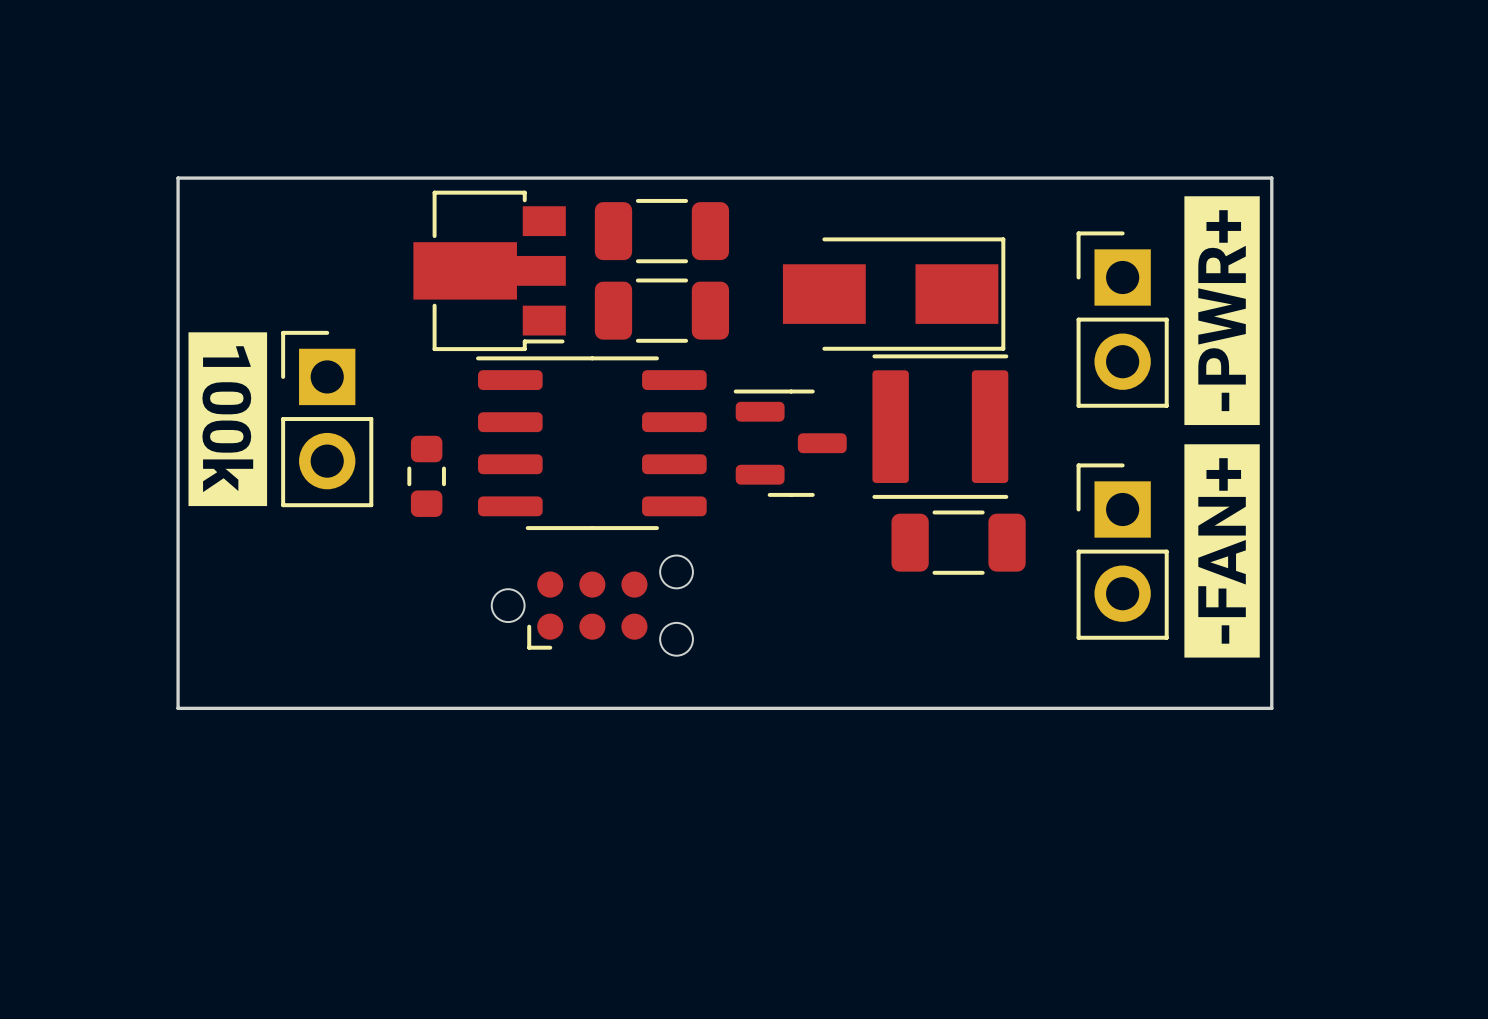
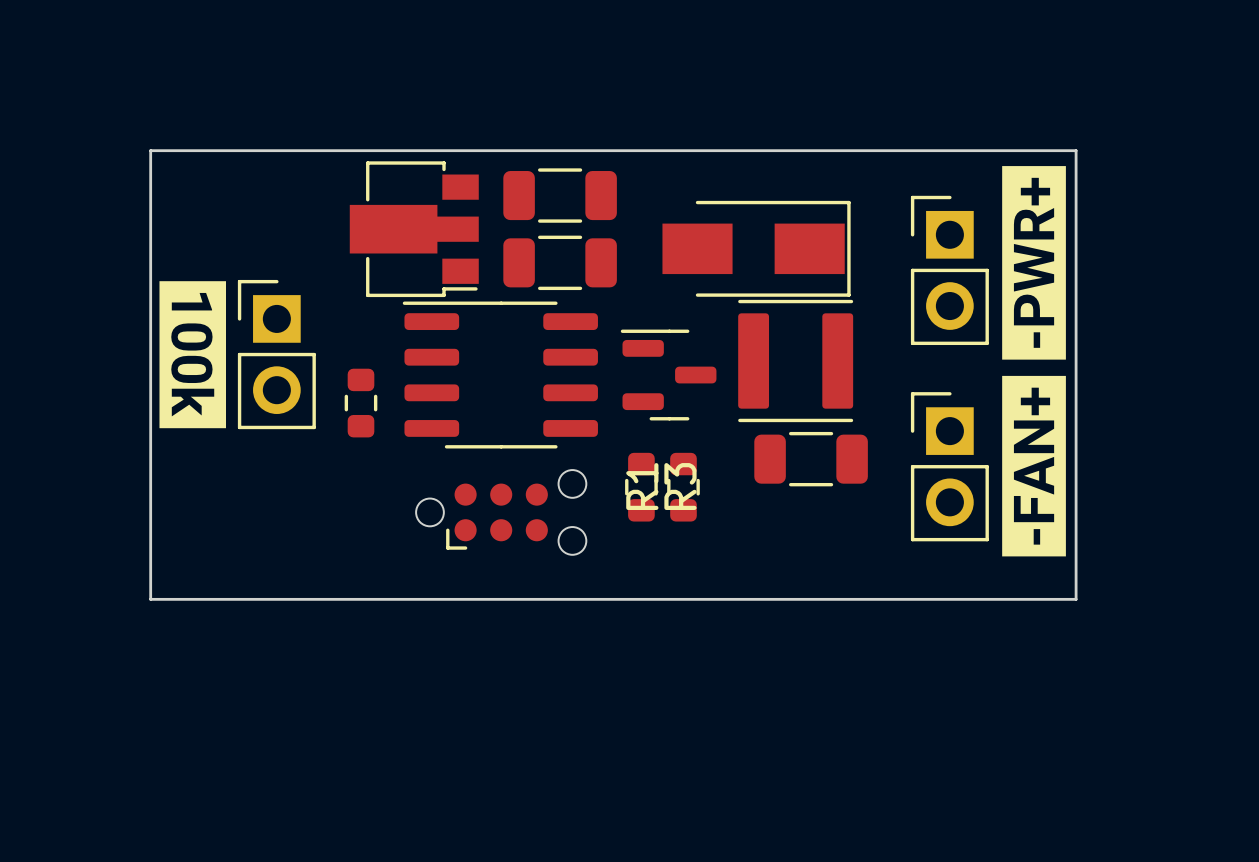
R3: none -> (641, 487)
R1: none -> (683, 487)

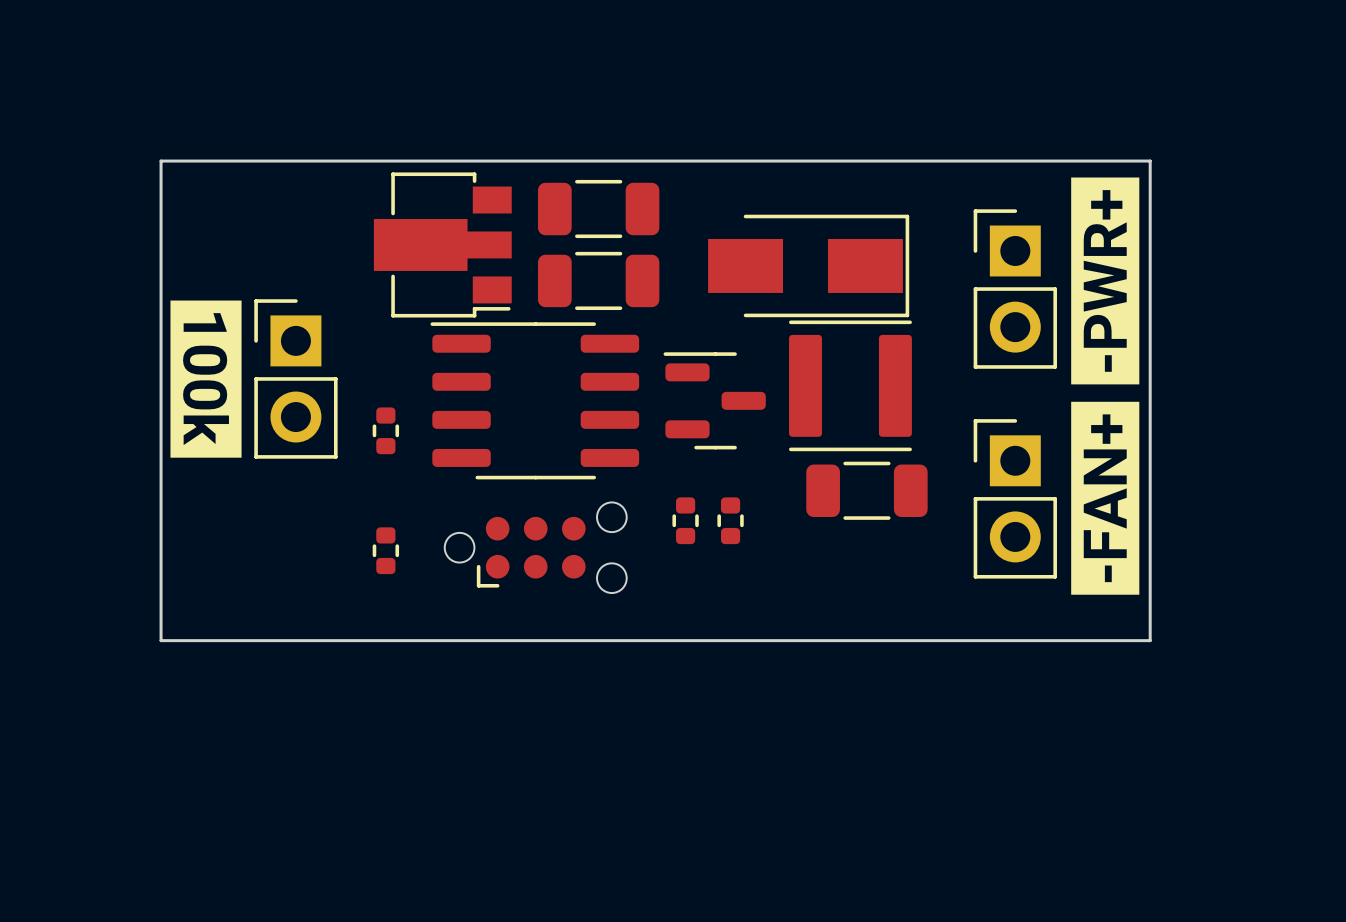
part footprint: [344, 368, 378, 438] -> [372, 407, 400, 455]
R3: (641, 487) -> none
part: none -> (685, 520)
R1: (683, 487) -> none
part: none -> (730, 520)
part: none -> (385, 550)

